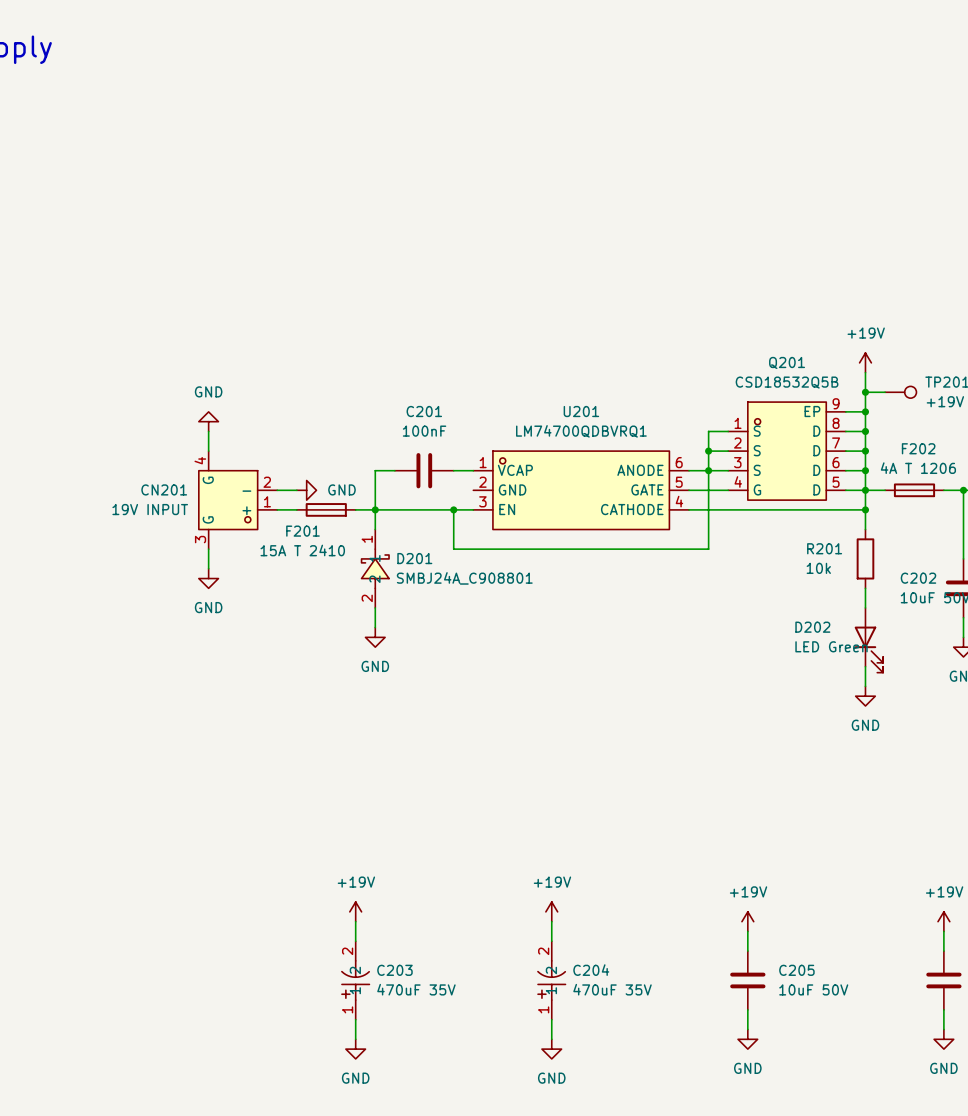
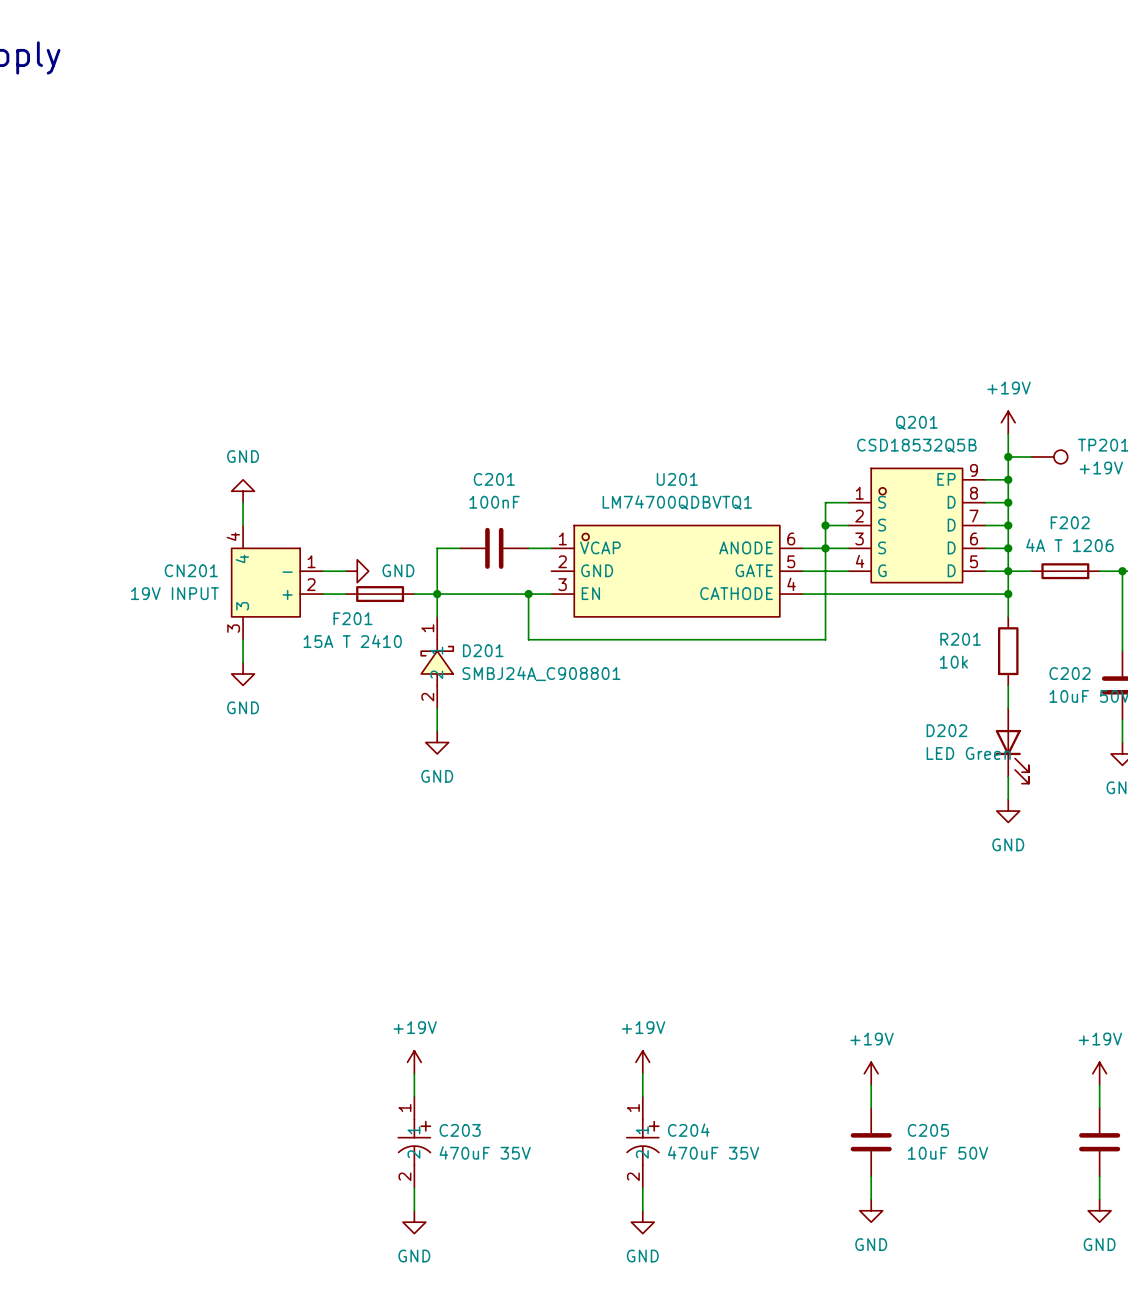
U201 value: LM74700QDBVRQ1 (581, 431) -> LM74700QDBVTQ1 (677, 502)
CN201 symbol: [198, 451, 278, 550] -> [231, 525, 324, 640]
C203 rotation: 0° (355, 980) -> 180° (414, 1142)
C204 rotation: 0° (551, 980) -> 180° (642, 1142)

